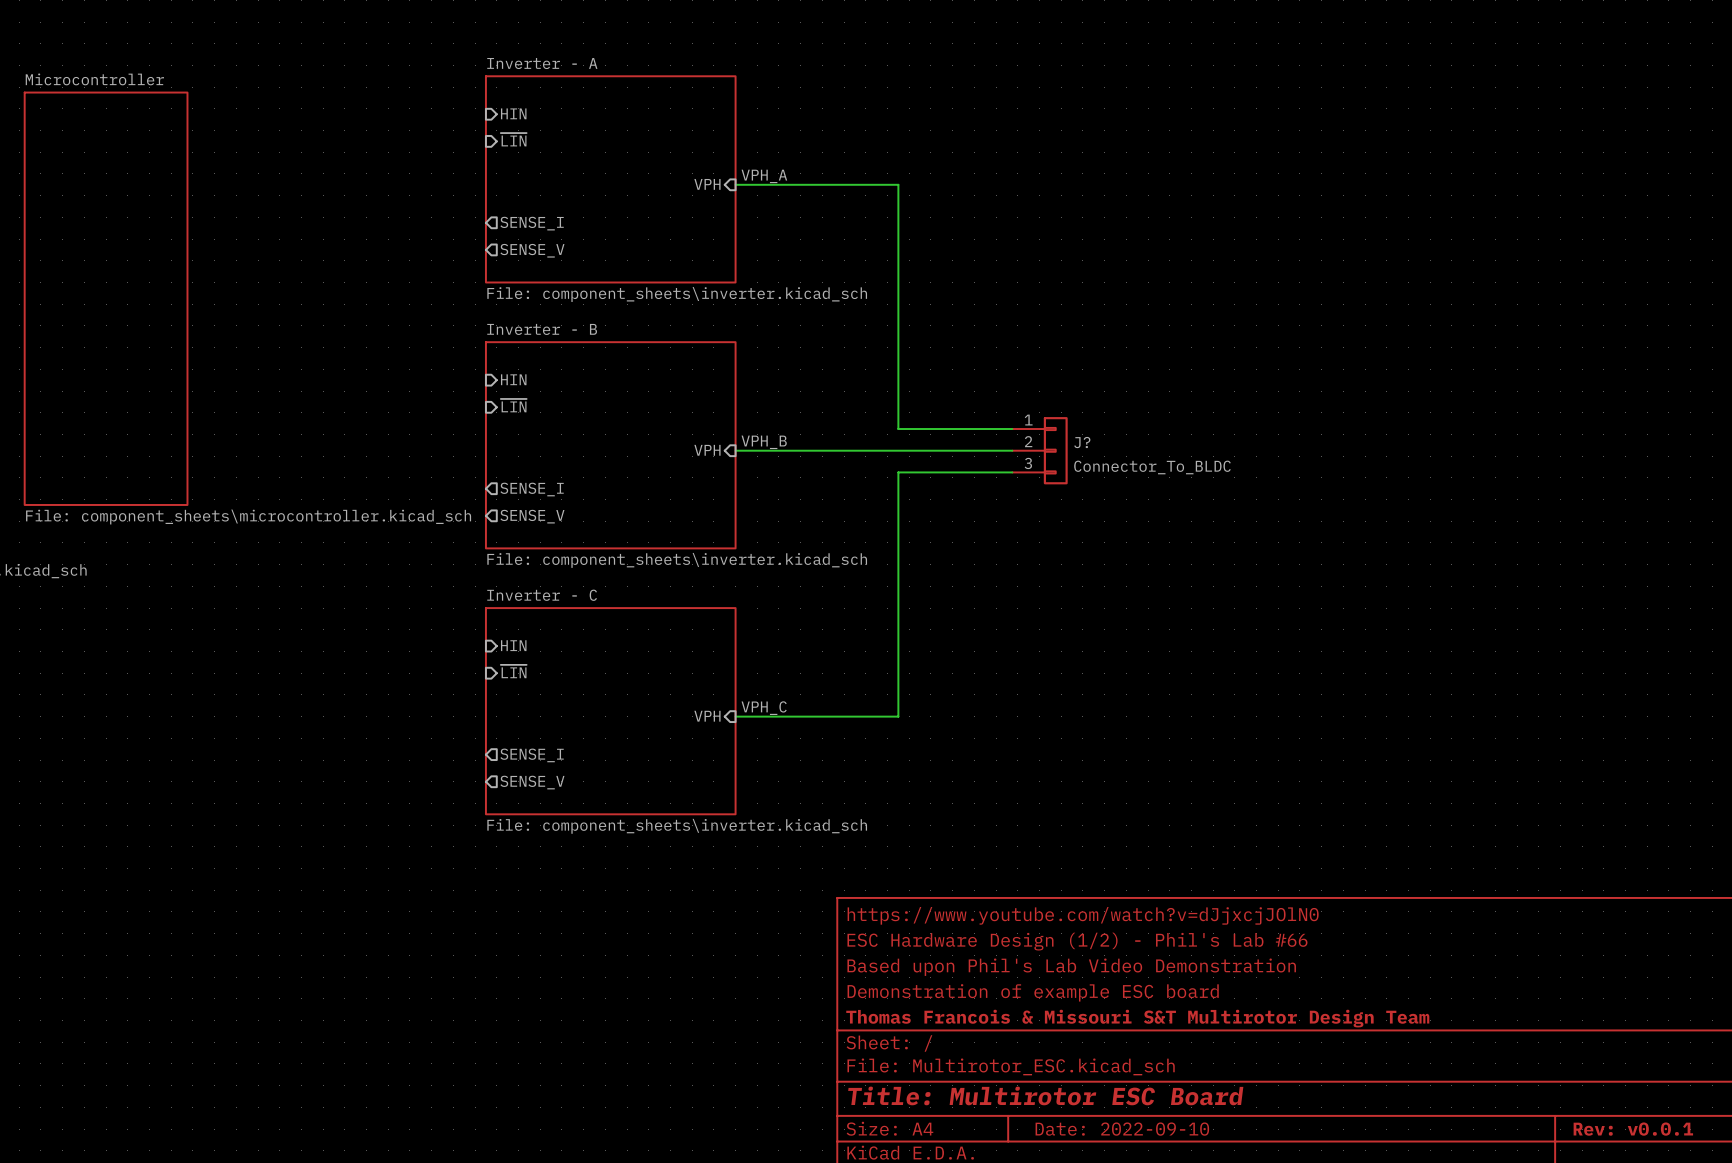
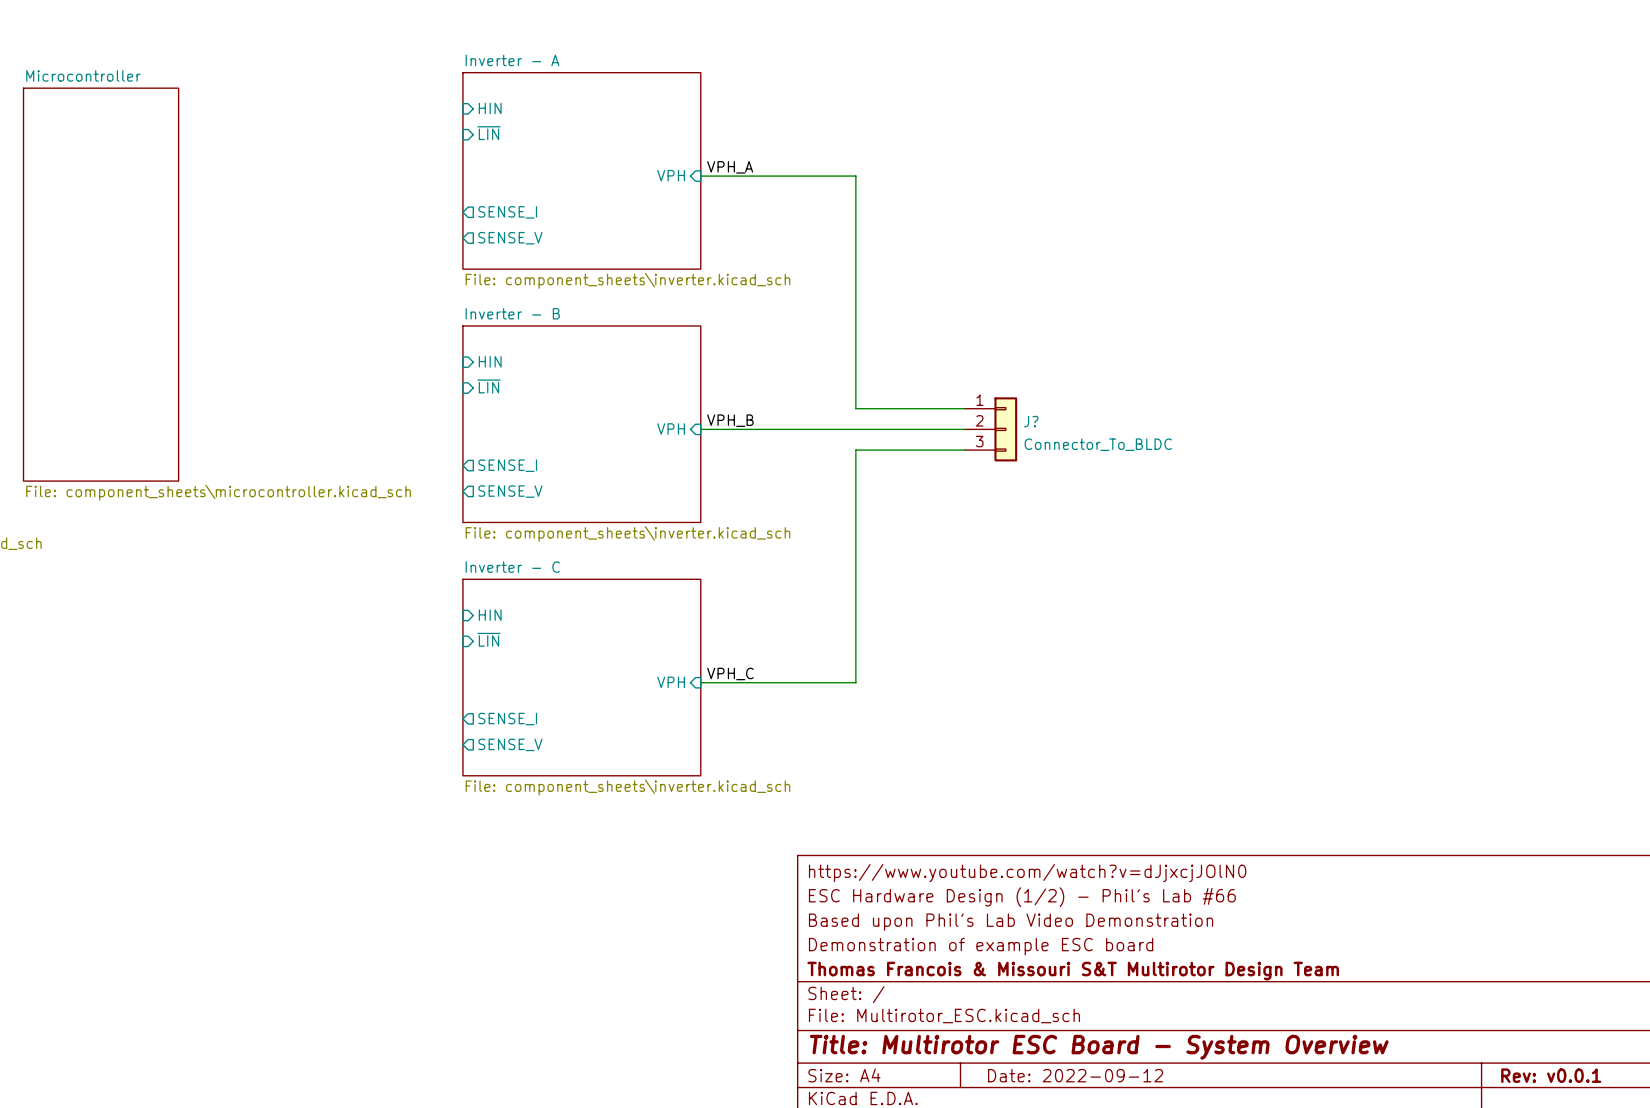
title block: Title: Multirotor ESC Board (1045, 1095) -> Title: Multirotor ESC Board - System Overview (1099, 1047)
title block: Date: 2022-09-10 (1122, 1129) -> Date: 2022-09-12 (1075, 1075)

